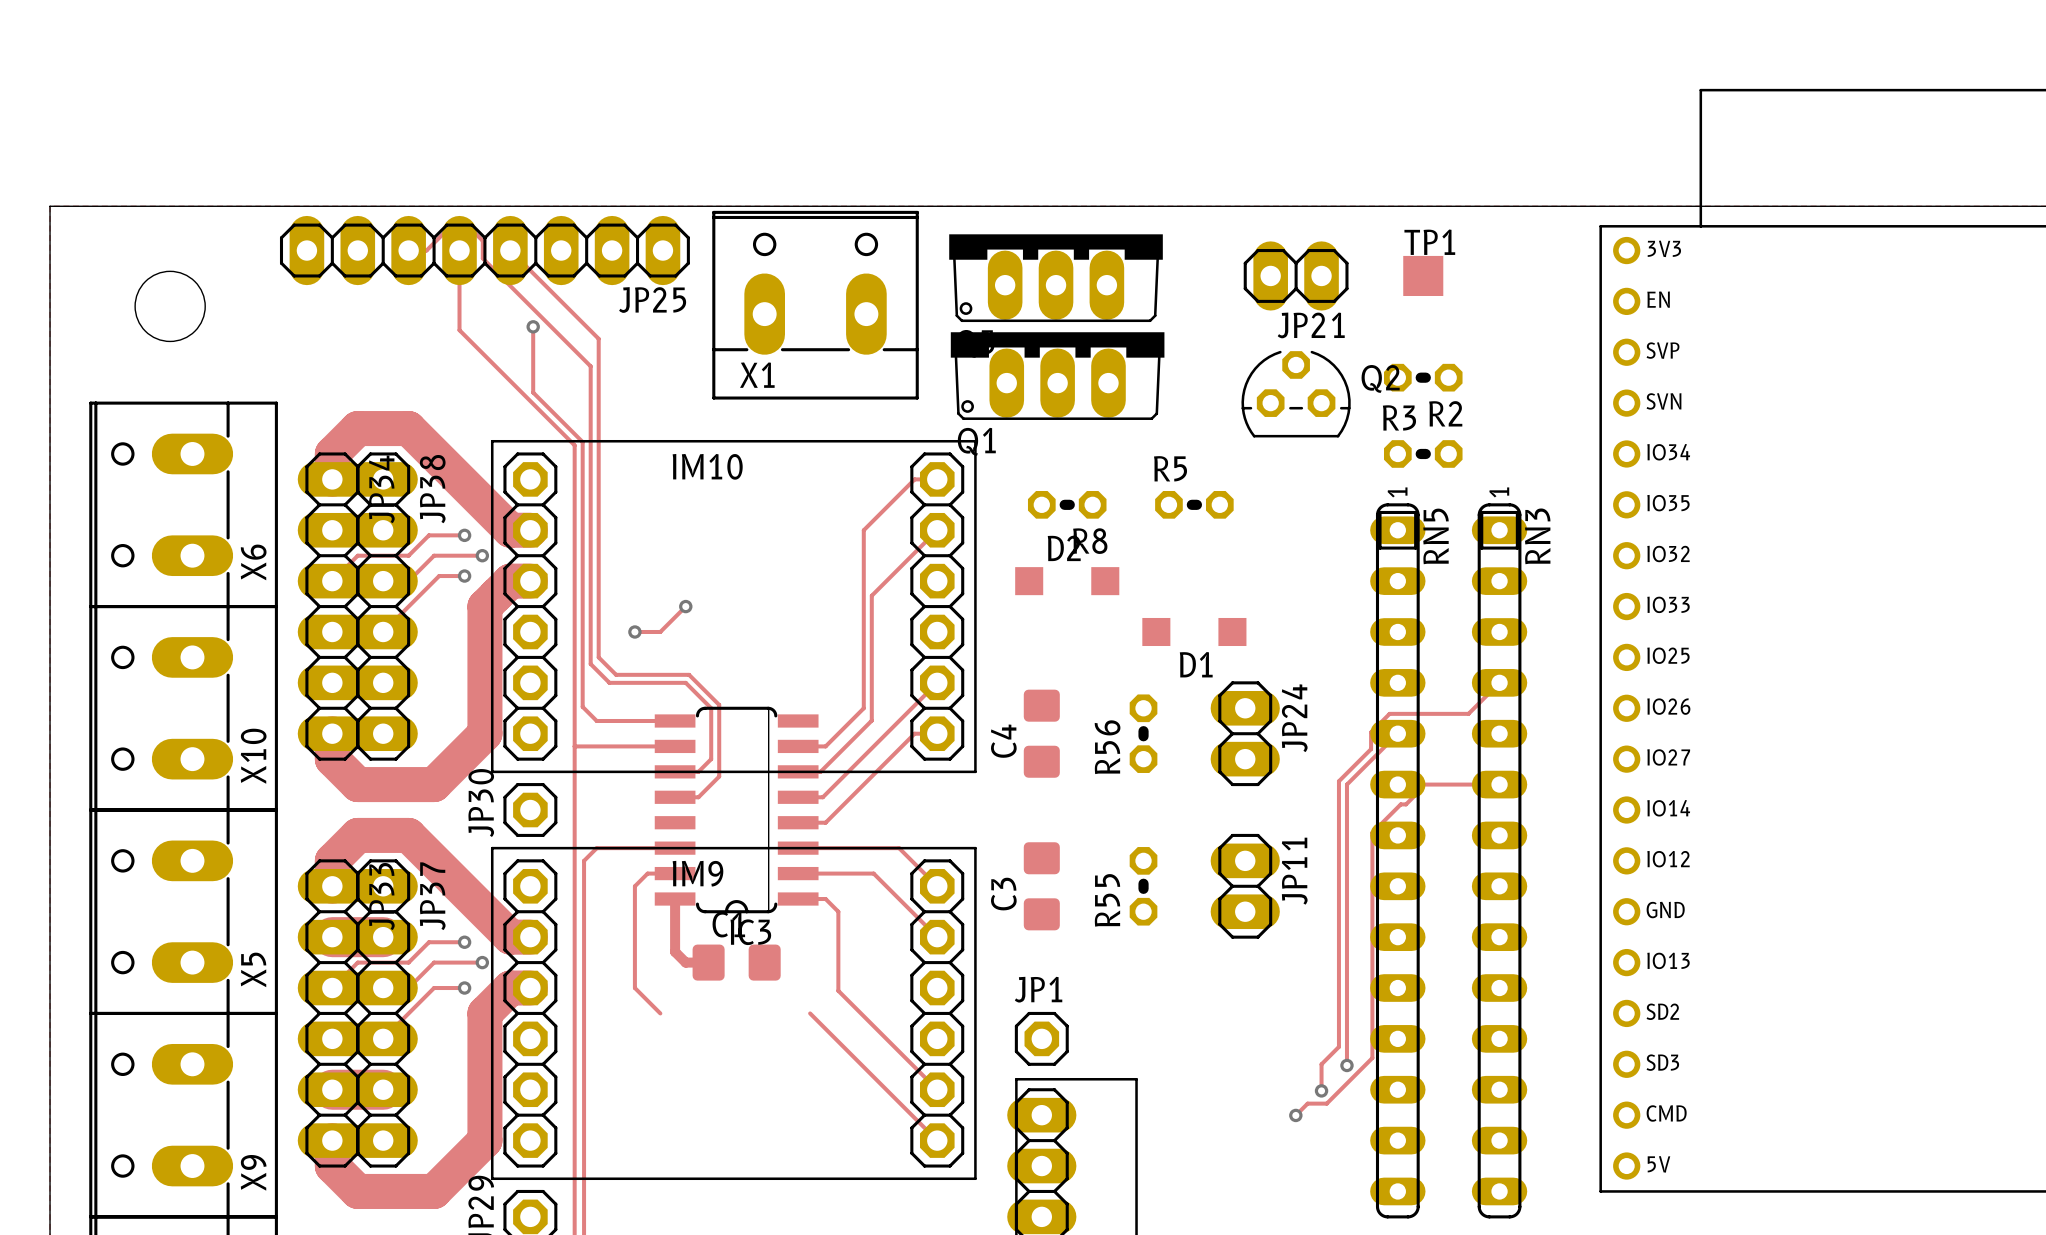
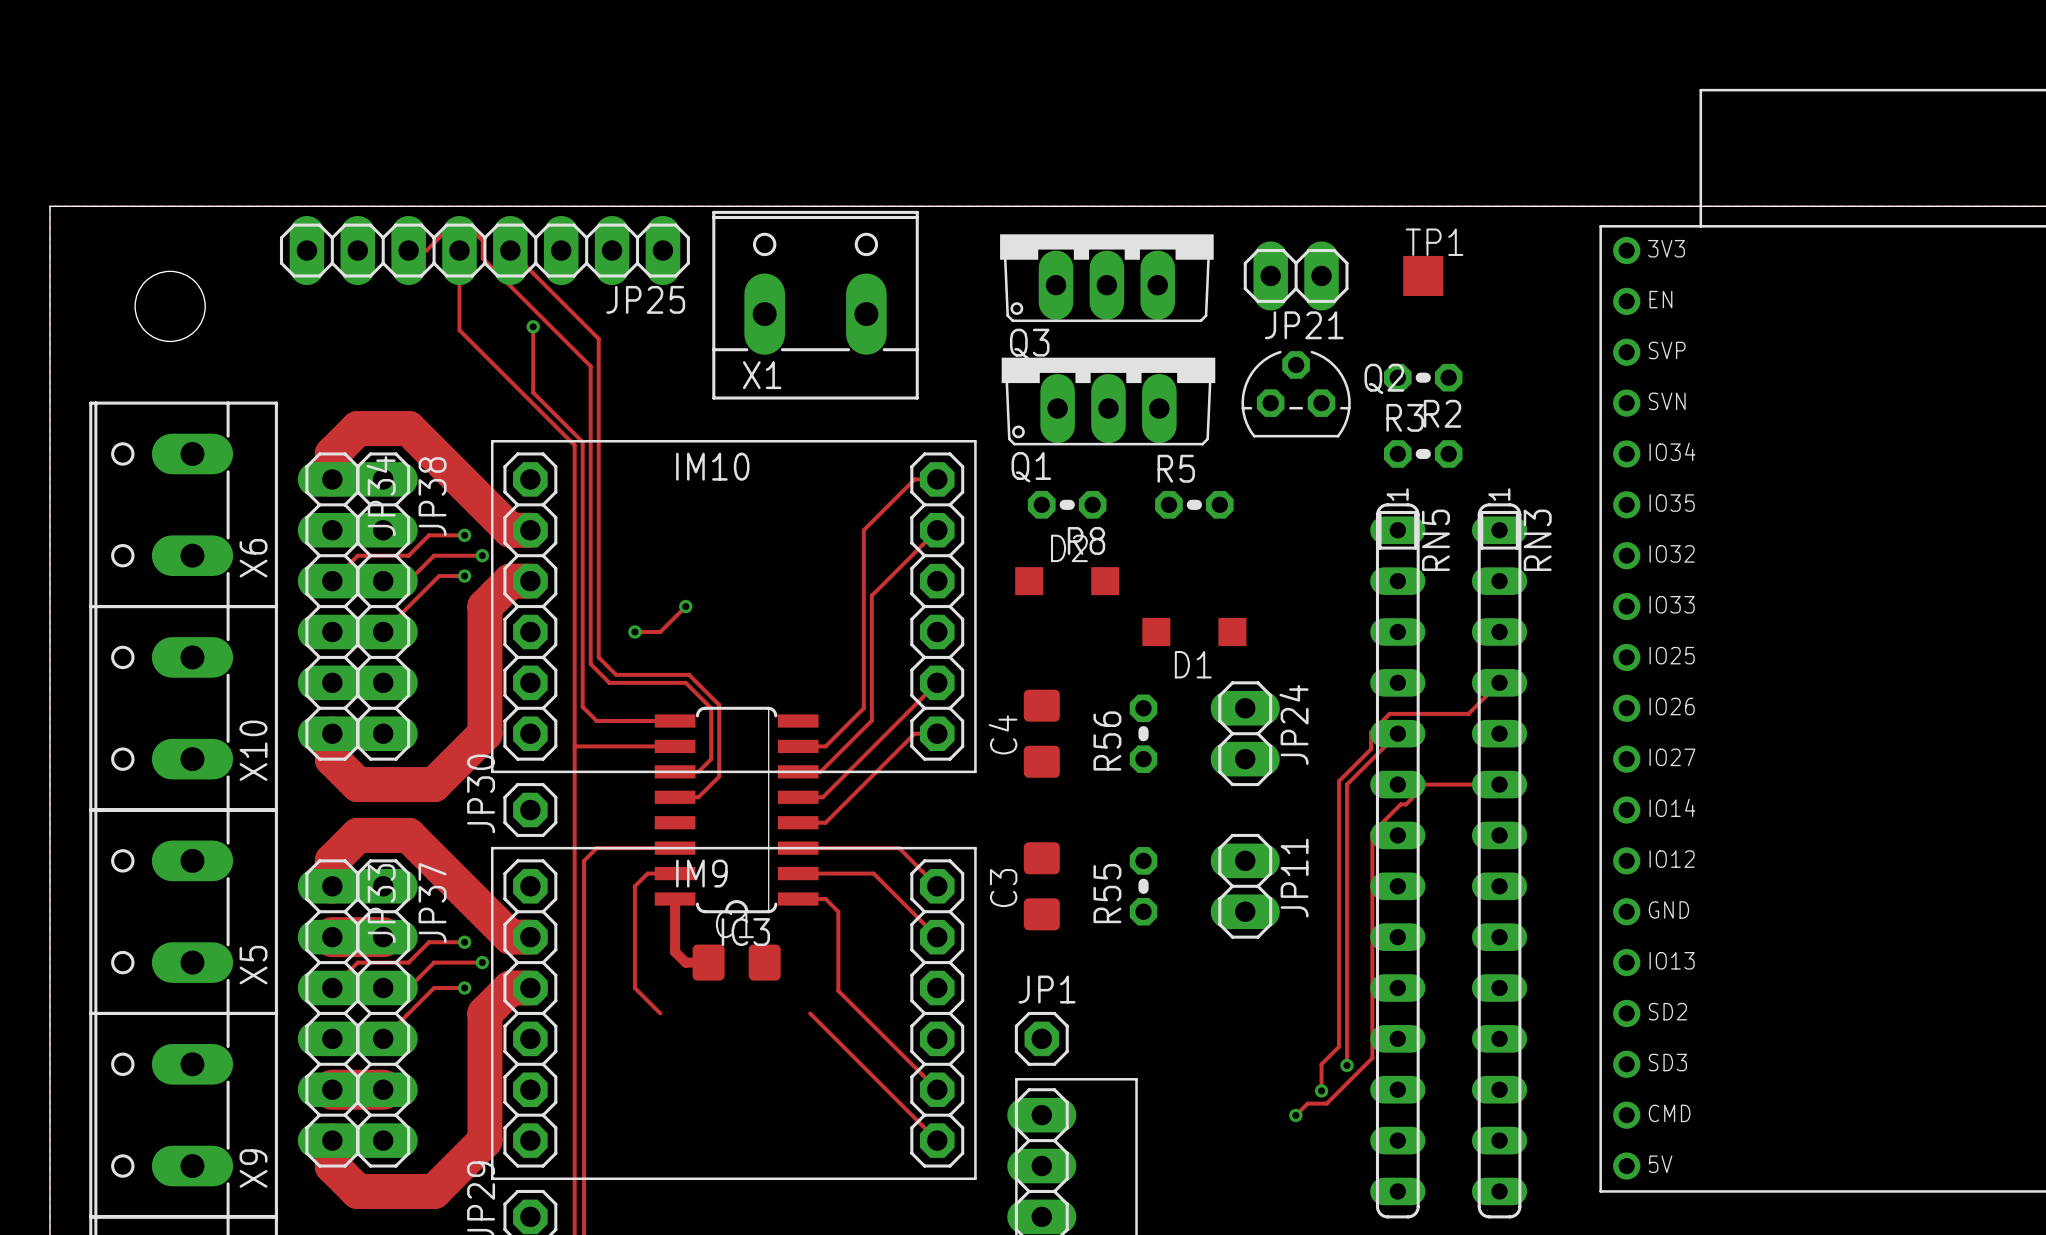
Q3 position: (1056, 278) -> (1106, 278)
Q1 position: (1057, 376) -> (1108, 401)

